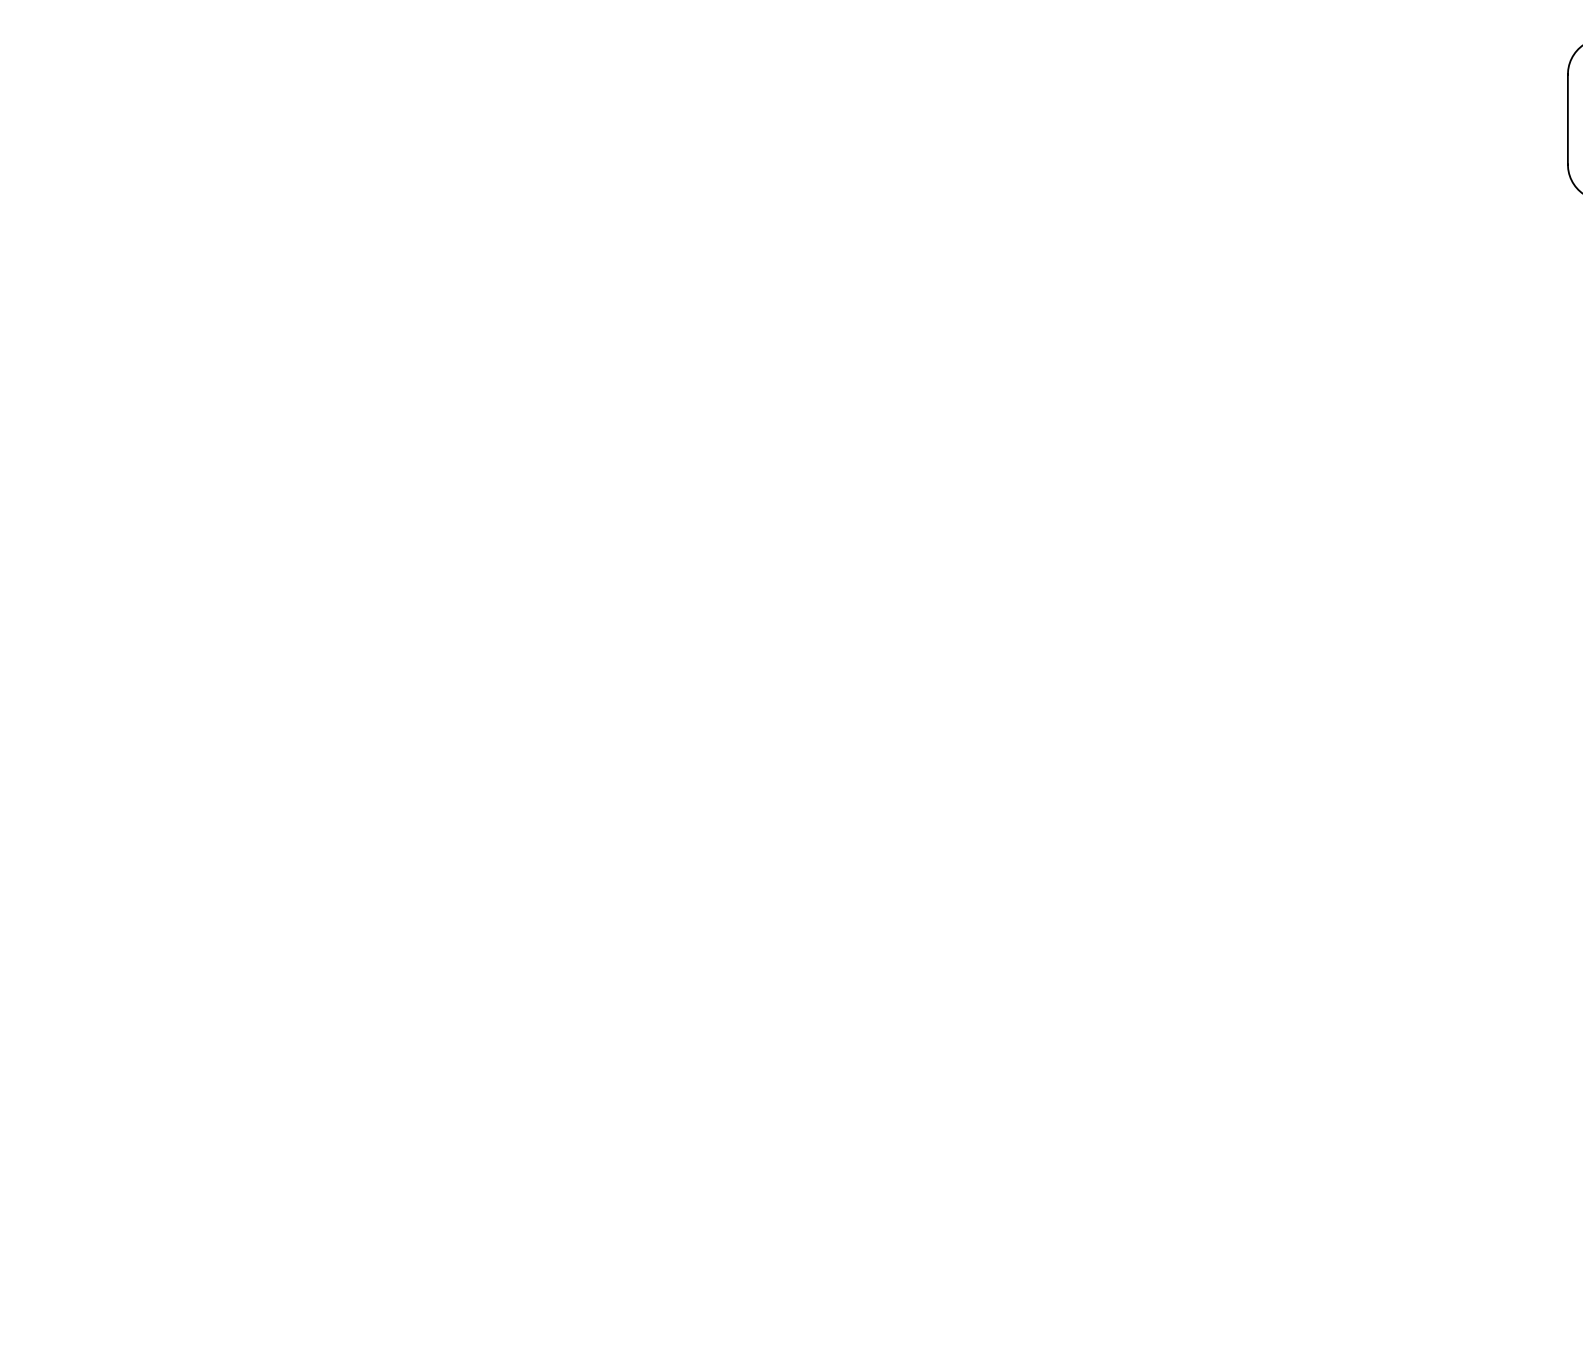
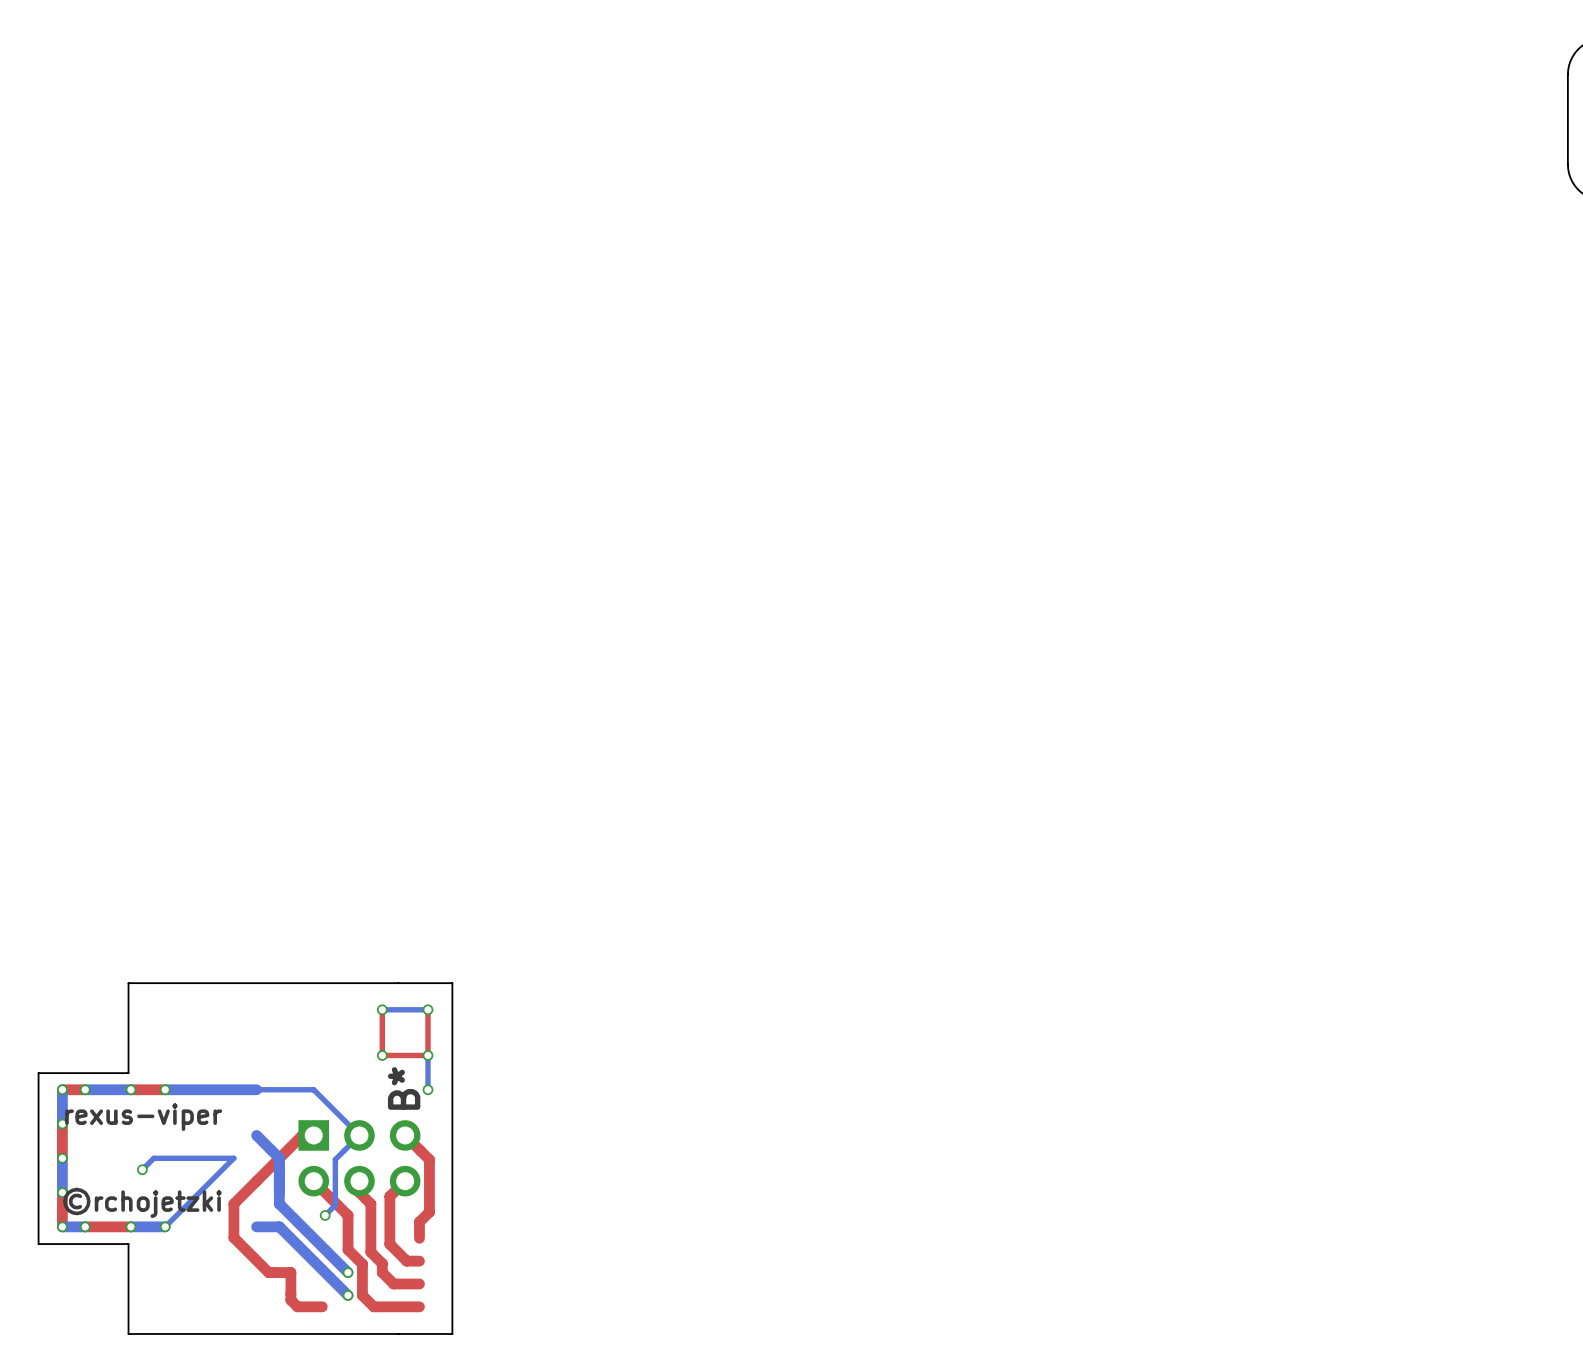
board edge: none -> (452, 983) (452, 1334) (128, 1334) (128, 1244) (38, 1244) (38, 1073) (128, 1073) (128, 983) (452, 983)
via: none -> (382, 1009)
bottom track: none -> (428, 1009) (382, 1009)
top track: none -> (428, 1009) (428, 1055) (382, 1055) (382, 1009)
via: none -> (428, 1009)
via: none -> (382, 1055)
bottom track: none -> (428, 1055) (428, 1089)
via: none -> (428, 1055)
text: none -> B* (404, 1088)
bottom track: none -> (62, 1089) (62, 1124)
via: none -> (62, 1089)
top track: none -> (85, 1089) (62, 1089)
via: none -> (85, 1089)
bottom track: none -> (130, 1089) (85, 1089)
via: none -> (130, 1089)
bottom track: none -> (165, 1089) (313, 1089) (359, 1135) (335, 1159) (335, 1205) (325, 1215)
top track: none -> (165, 1089) (130, 1089)
via: none -> (165, 1089)
via: none -> (428, 1089)
text: none -> rexus-viper (143, 1117)
top track: none -> (62, 1124) (62, 1158)
via: none -> (62, 1124)
bottom track: none -> (256, 1135) (279, 1158) (279, 1203) (348, 1272)
top track: none -> (313, 1135) (302, 1135) (233, 1203) (233, 1237) (268, 1272) (290, 1272) (290, 1300) (297, 1306) (322, 1306)
top track: none -> (405, 1135) (429, 1159) (429, 1212) (419, 1222) (419, 1238)
bottom track: none -> (62, 1158) (62, 1192)
via: none -> (62, 1158)
part: none -> (359, 1158)
bottom track: none -> (142, 1169) (153, 1158) (233, 1158) (165, 1226) (130, 1226)
via: none -> (142, 1169)
top track: none -> (313, 1181) (348, 1215) (348, 1249) (362, 1264) (362, 1295) (373, 1306) (419, 1306)
top track: none -> (359, 1181) (359, 1192) (370, 1204) (370, 1252) (382, 1263) (382, 1272) (393, 1283) (419, 1283)
top track: none -> (405, 1181) (389, 1196) (389, 1244) (406, 1261) (419, 1261)
top track: none -> (62, 1192) (62, 1226)
via: none -> (62, 1192)
text: none -> ©rchojetzki (142, 1202)
via: none -> (325, 1215)
via: none -> (62, 1226)
bottom track: none -> (85, 1226) (62, 1226)
via: none -> (85, 1226)
top track: none -> (130, 1226) (85, 1226)
via: none -> (130, 1226)
via: none -> (165, 1226)
bottom track: none -> (256, 1226) (279, 1226) (348, 1295)
via: none -> (348, 1272)
via: none -> (348, 1295)

